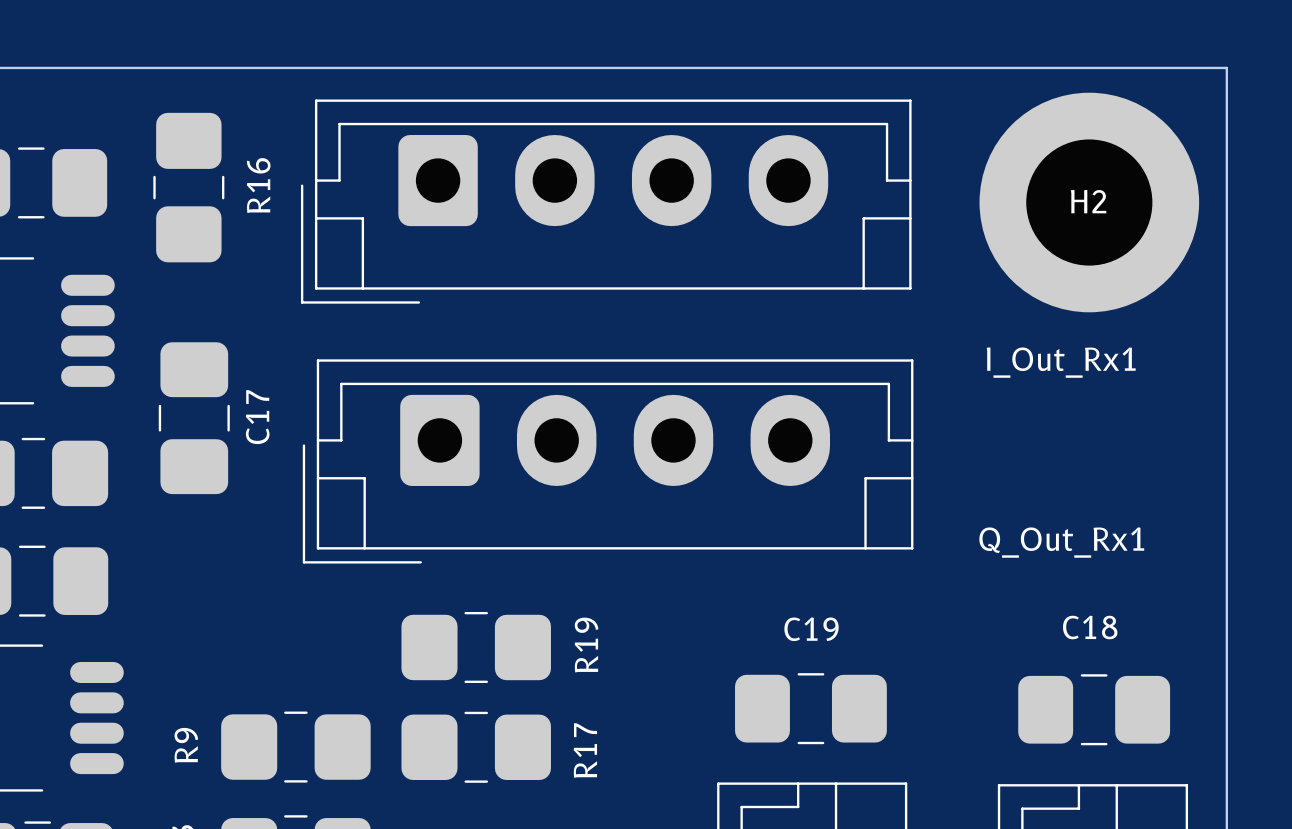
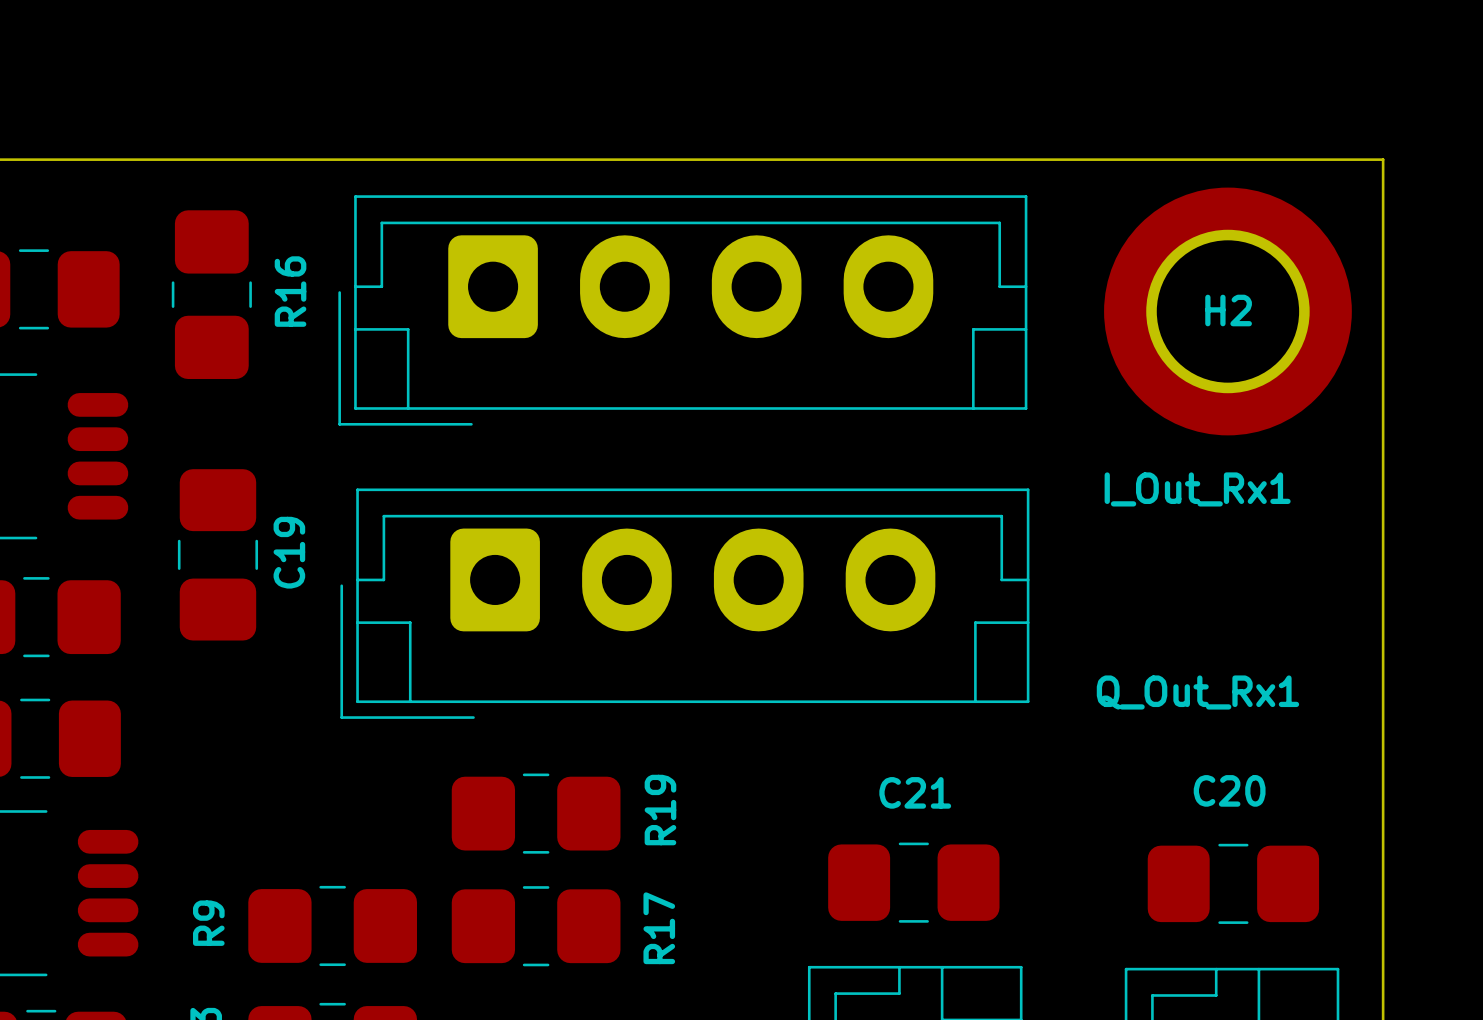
C17 name: C17 (257, 417) -> C19 (289, 552)
C18 name: C18 (1090, 627) -> C20 (1229, 790)
C19 name: C19 (811, 629) -> C21 (915, 792)

